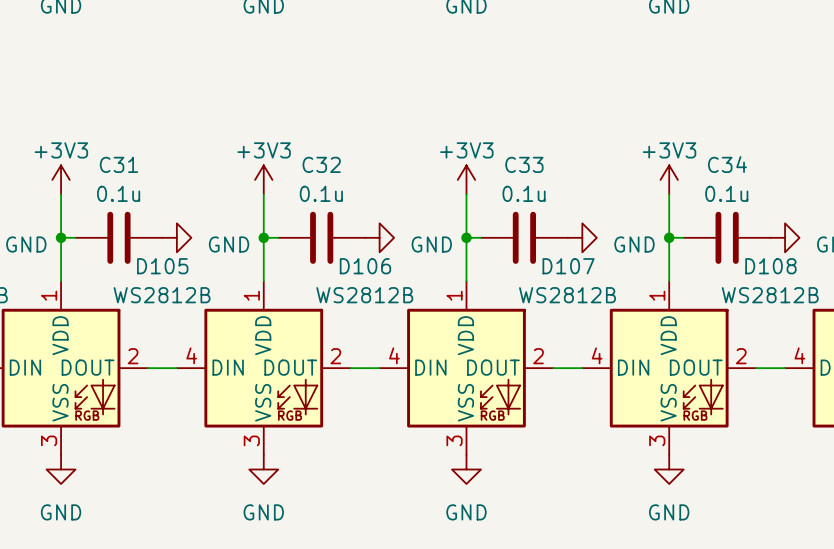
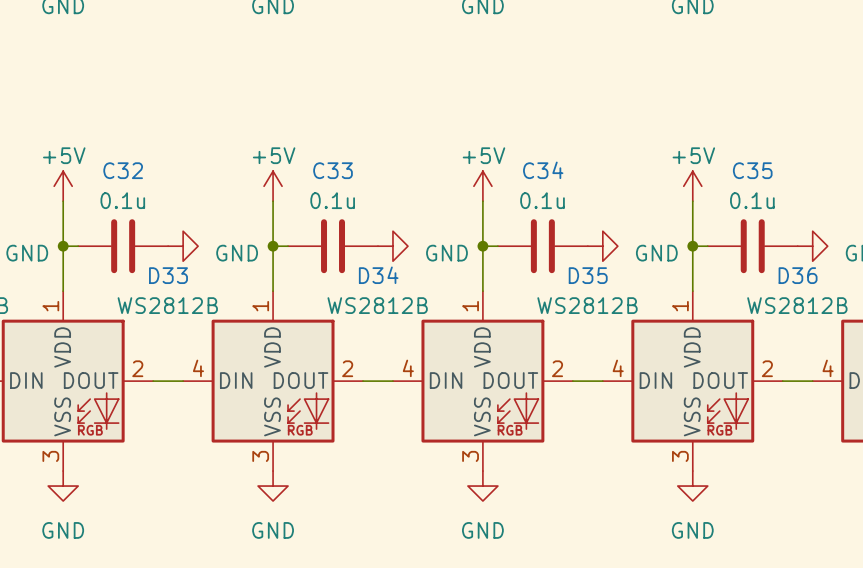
C31 name: C31 (118, 164) -> C32 (123, 170)
C32 name: C32 (321, 164) -> C33 (333, 170)
C33 name: C33 (524, 164) -> C34 (543, 170)
C34 name: C34 (727, 164) -> C35 (752, 170)
power symbol: +3V3 (61, 179) -> +5V (63, 186)
power symbol: +3V3 (263, 179) -> +5V (273, 186)
power symbol: +3V3 (466, 179) -> +5V (482, 186)
power symbol: +3V3 (669, 179) -> +5V (692, 186)
D105 name: D105 (162, 266) -> D33 (168, 275)
D106 name: D106 (365, 266) -> D34 (378, 275)
D107 name: D107 (568, 266) -> D35 (588, 275)
D108 name: D108 (770, 266) -> D36 (798, 275)

